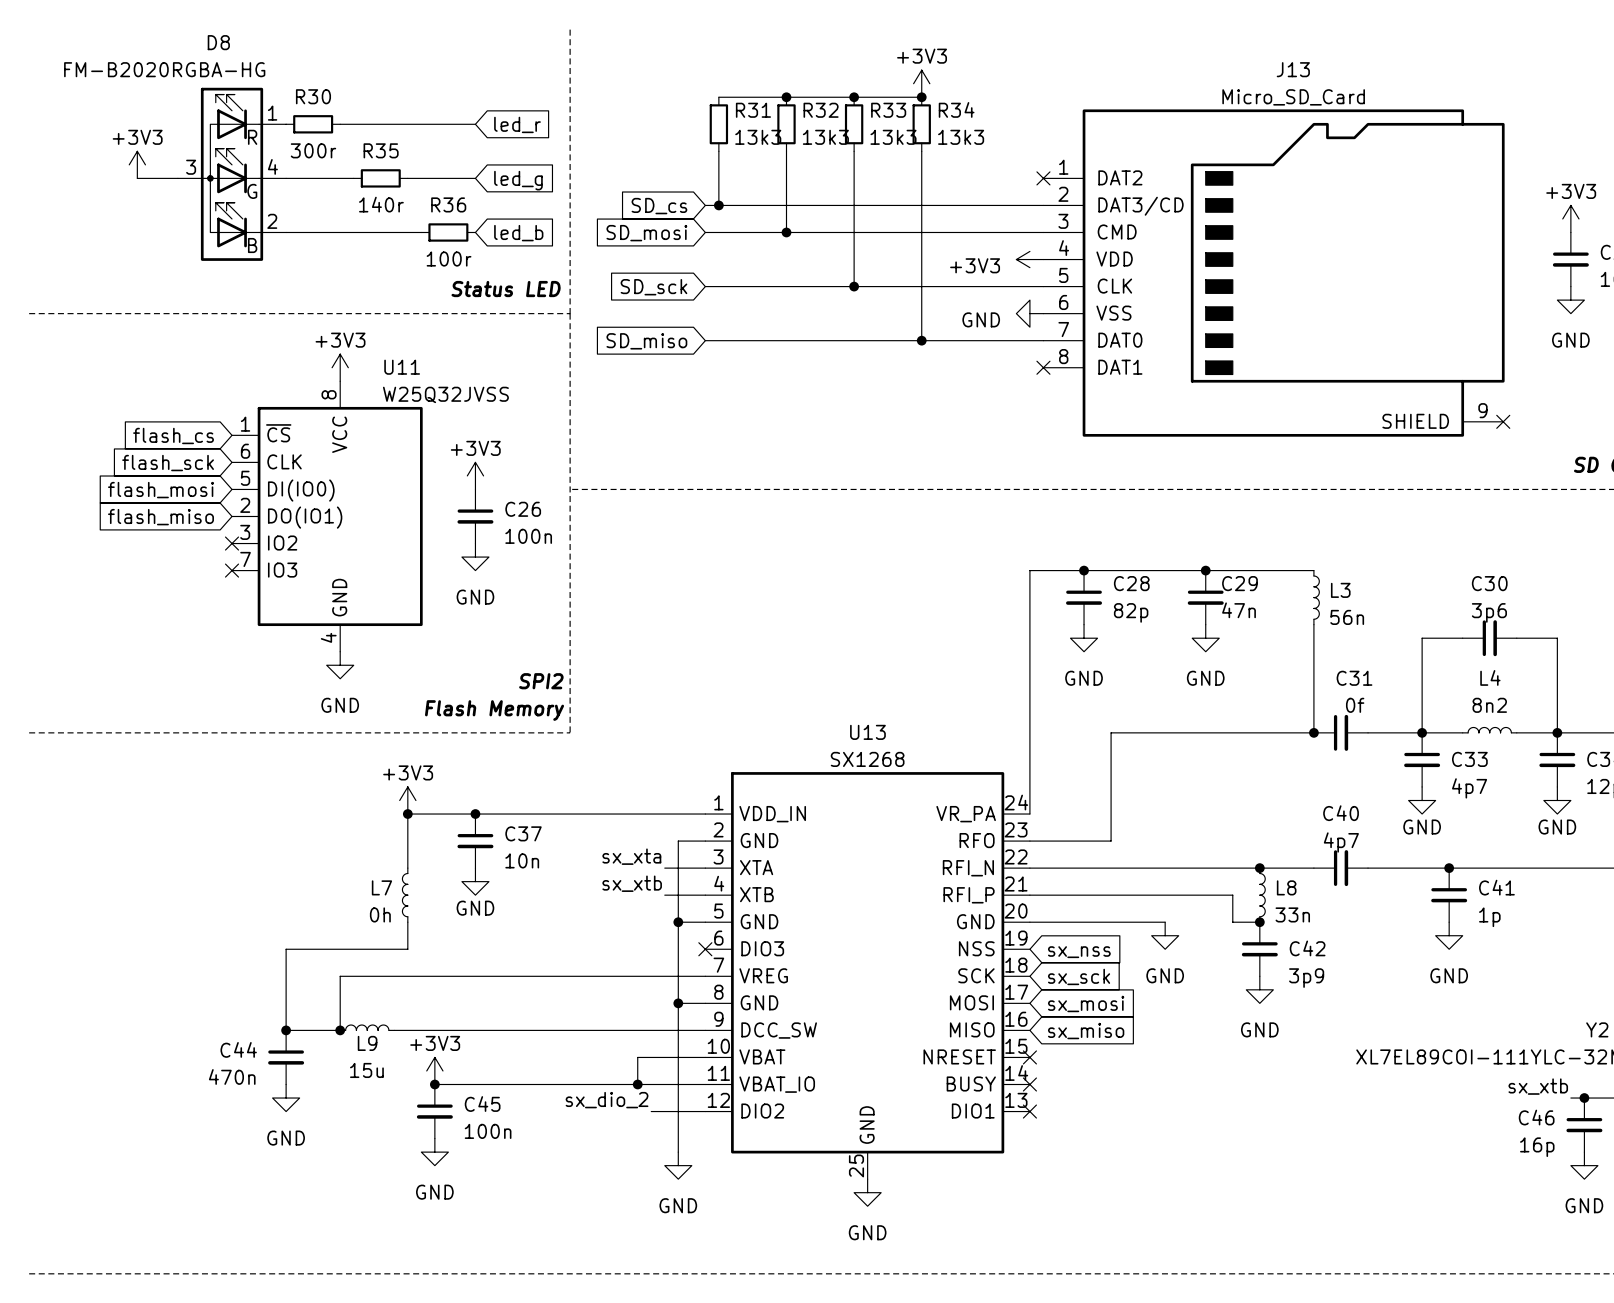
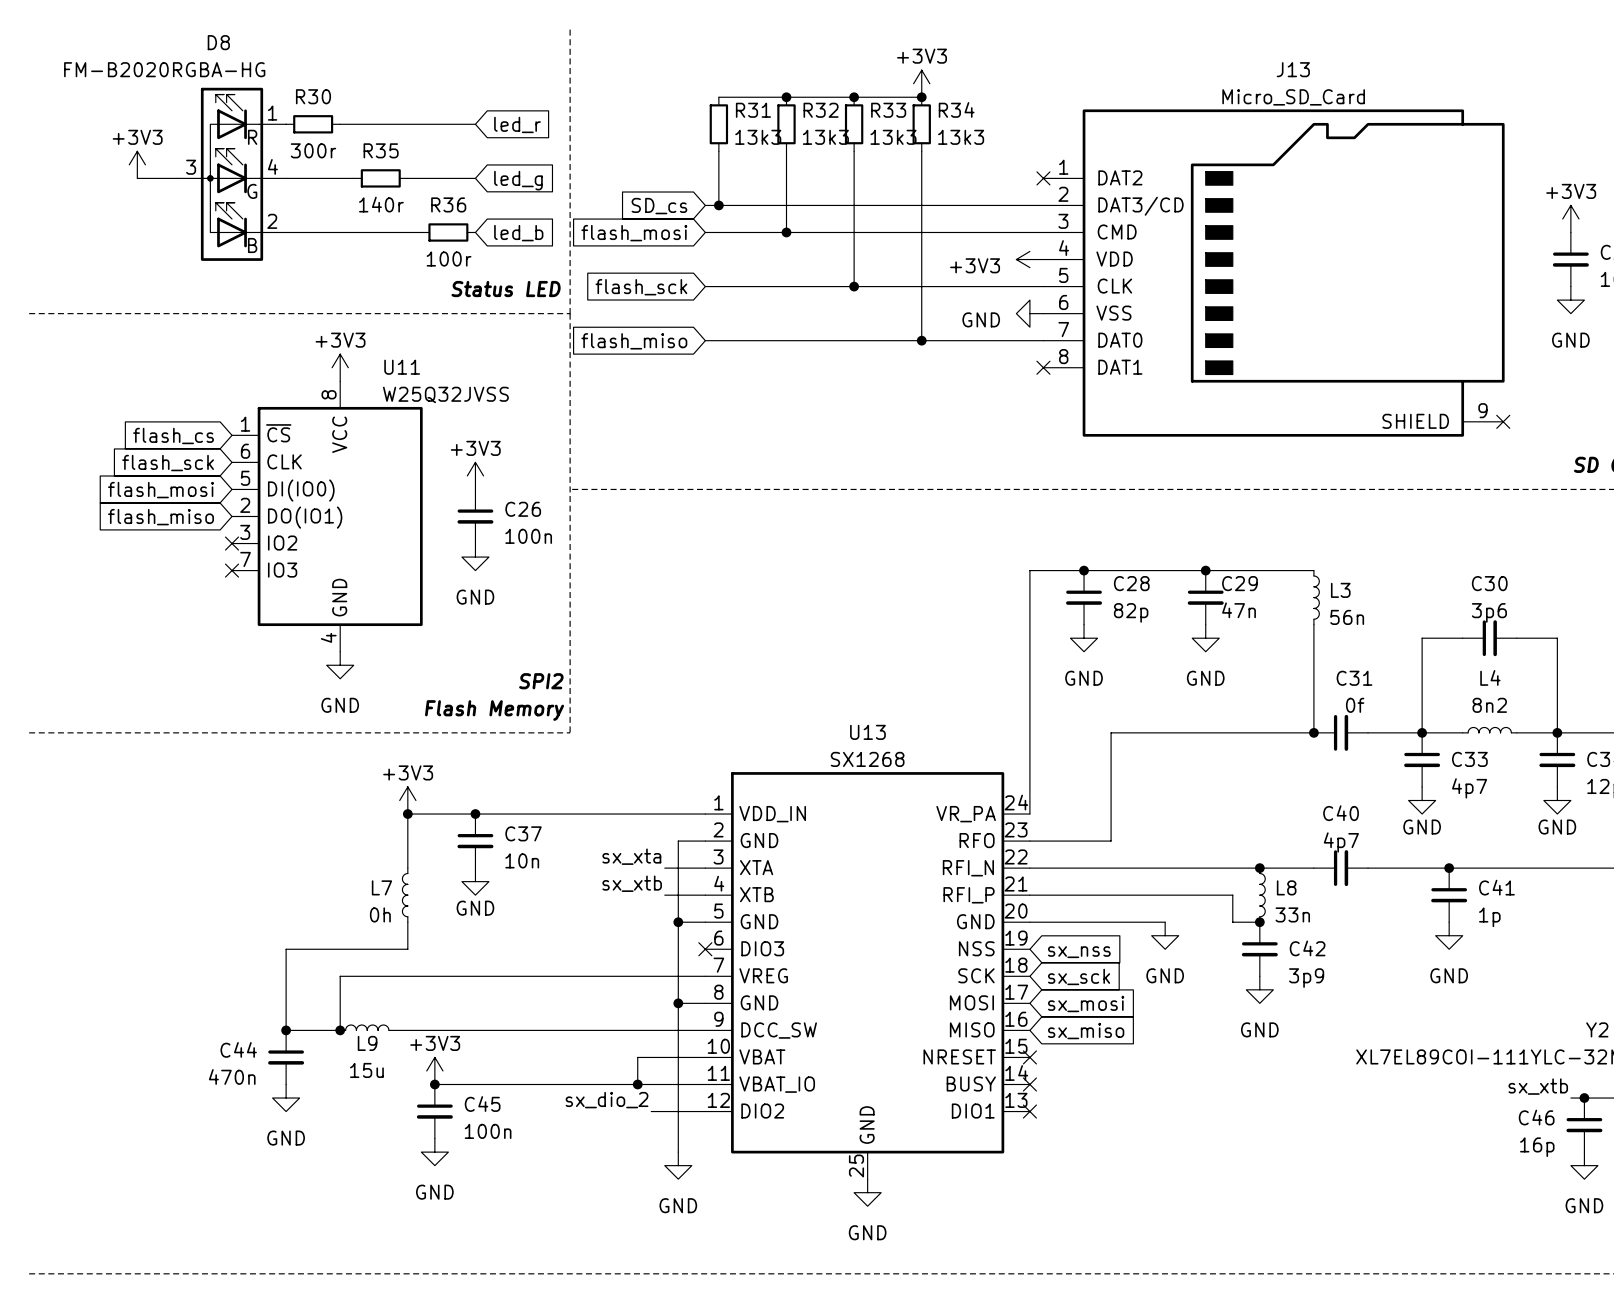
global label: SD_mosi (646, 233) -> flash_mosi (634, 233)
global label: SD_sck (653, 287) -> flash_sck (641, 287)
global label: SD_miso (646, 341) -> flash_miso (634, 341)

